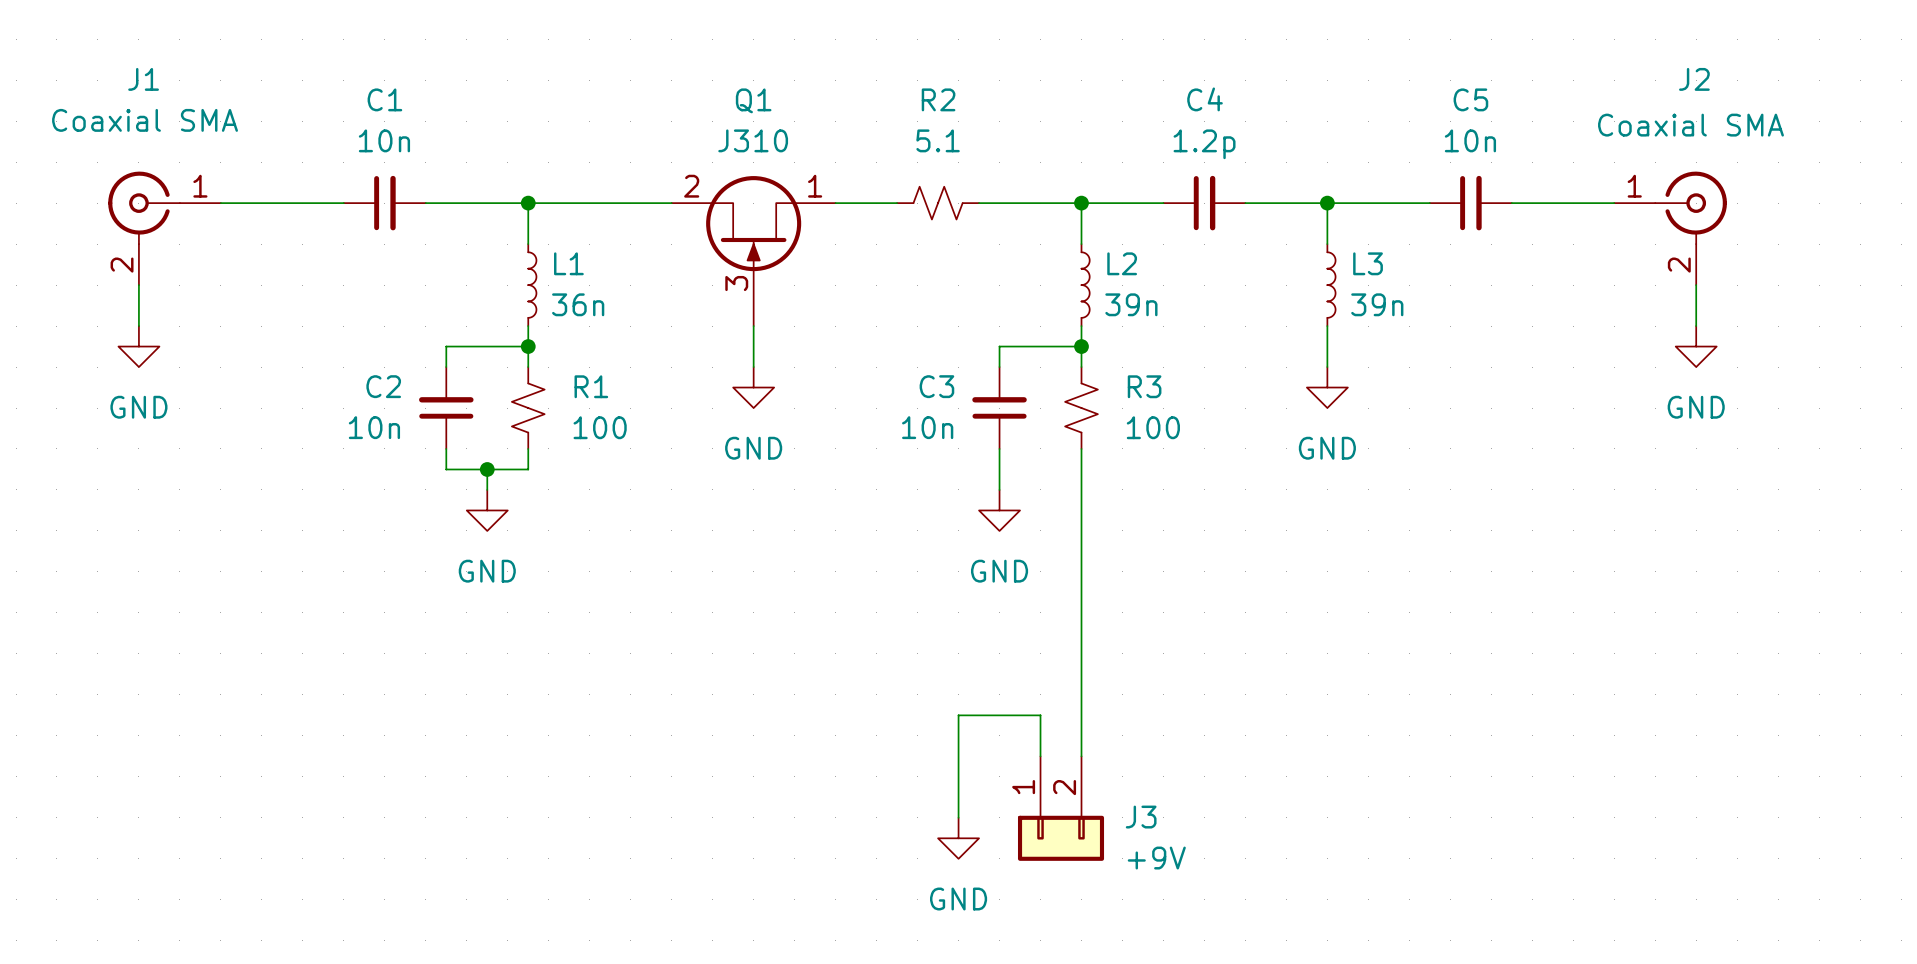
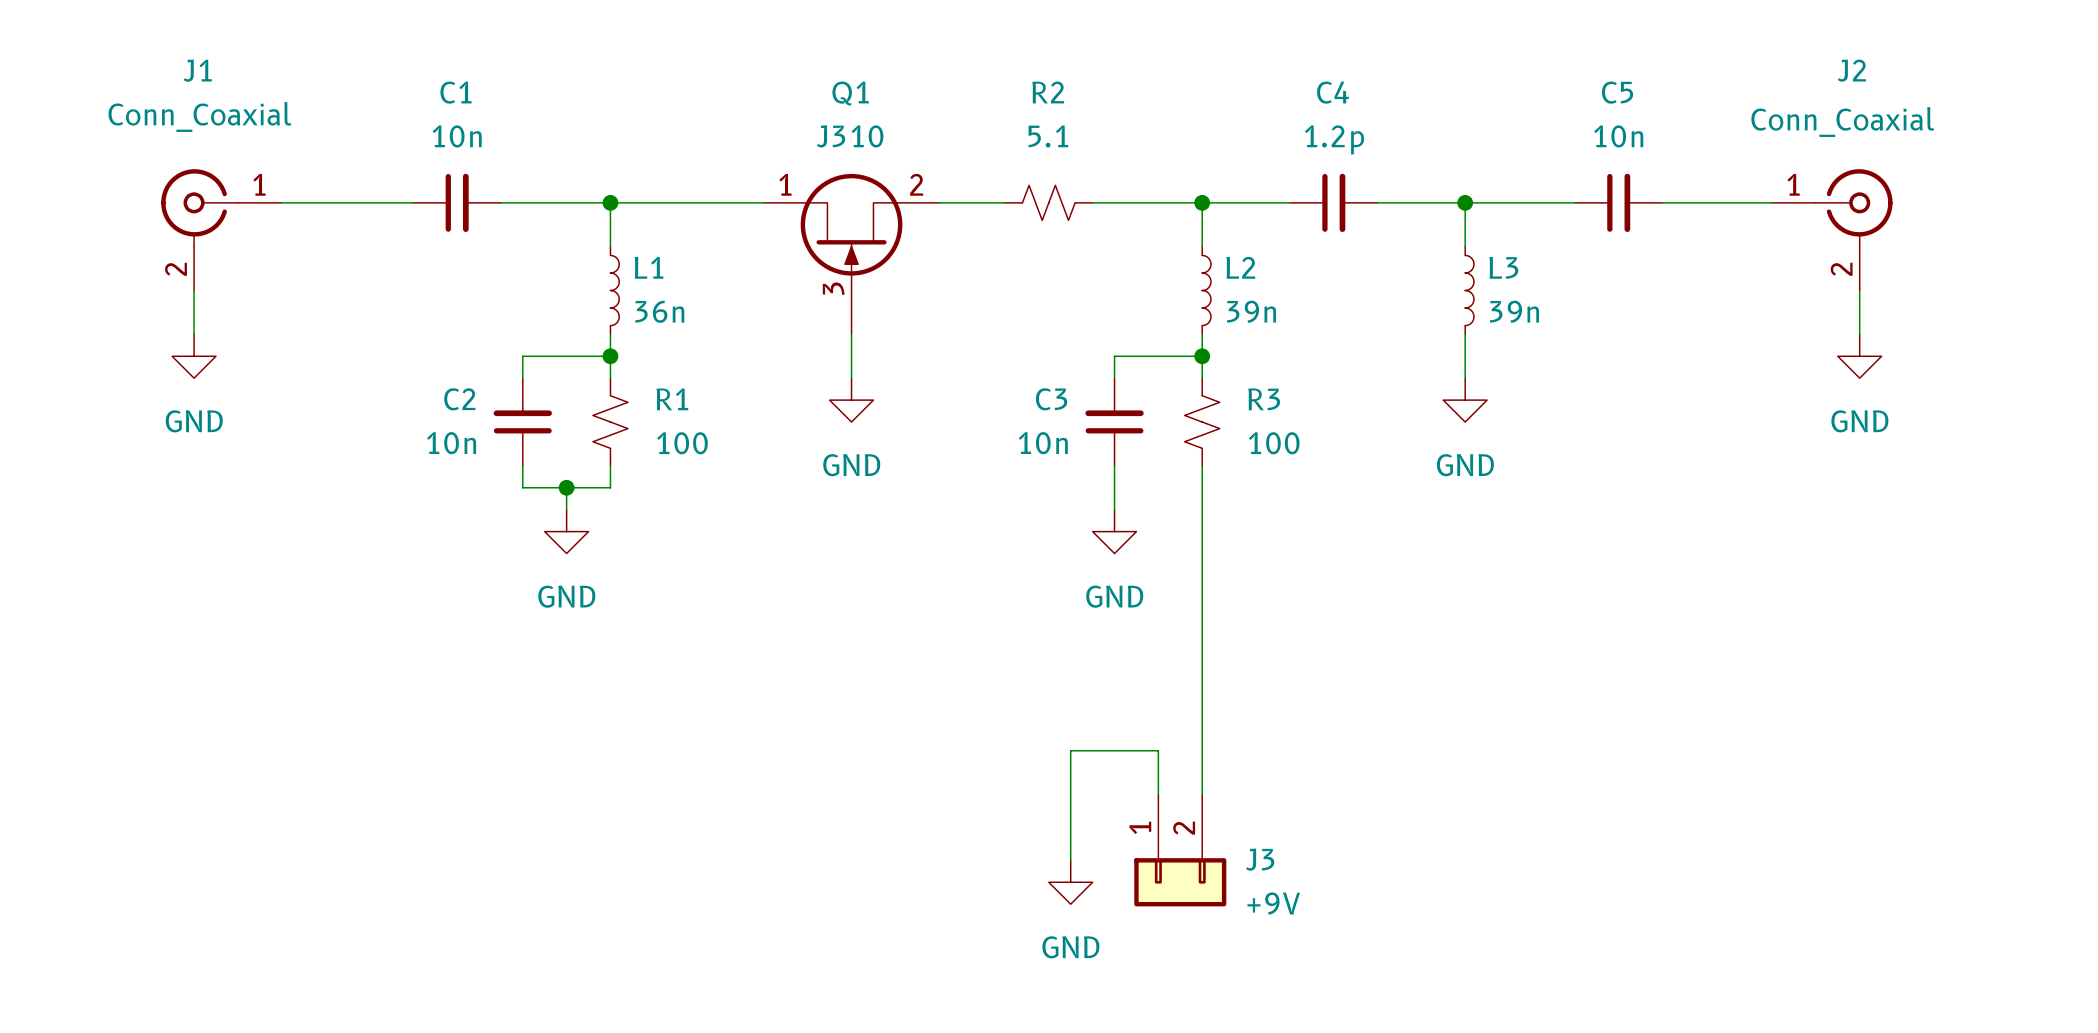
J1 value: Coaxial SMA (145, 120) -> Conn_Coaxial (199, 116)
J2 value: Coaxial SMA (1690, 125) -> Conn_Coaxial (1842, 122)
Q1 flip: as is (753, 223) -> left-right (851, 224)

